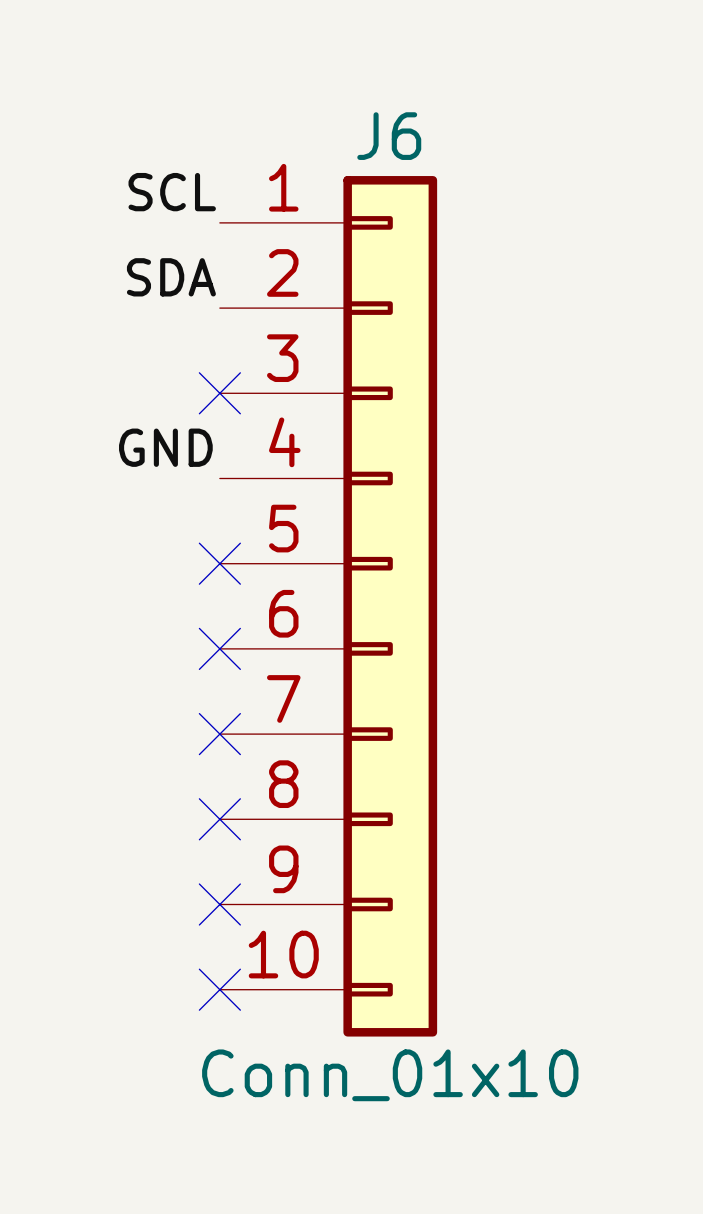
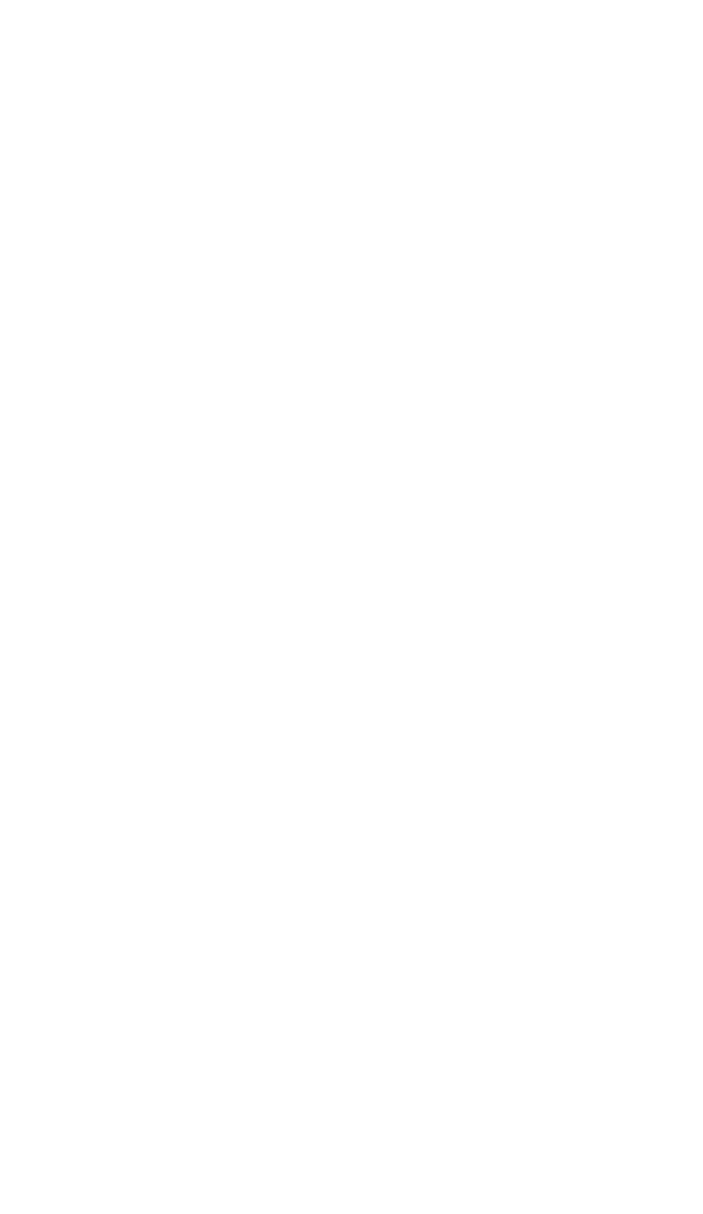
label: SCL (172, 192) -> none
label: SDA (171, 277) -> none
no-connect mark: (219, 393) -> none
label: GND (165, 447) -> none
no-connect mark: (219, 563) -> none
J6: Conn_01x10 (328, 606) -> none
no-connect mark: (219, 648) -> none
no-connect mark: (219, 734) -> none
no-connect mark: (219, 819) -> none
no-connect mark: (219, 904) -> none
no-connect mark: (219, 989) -> none

